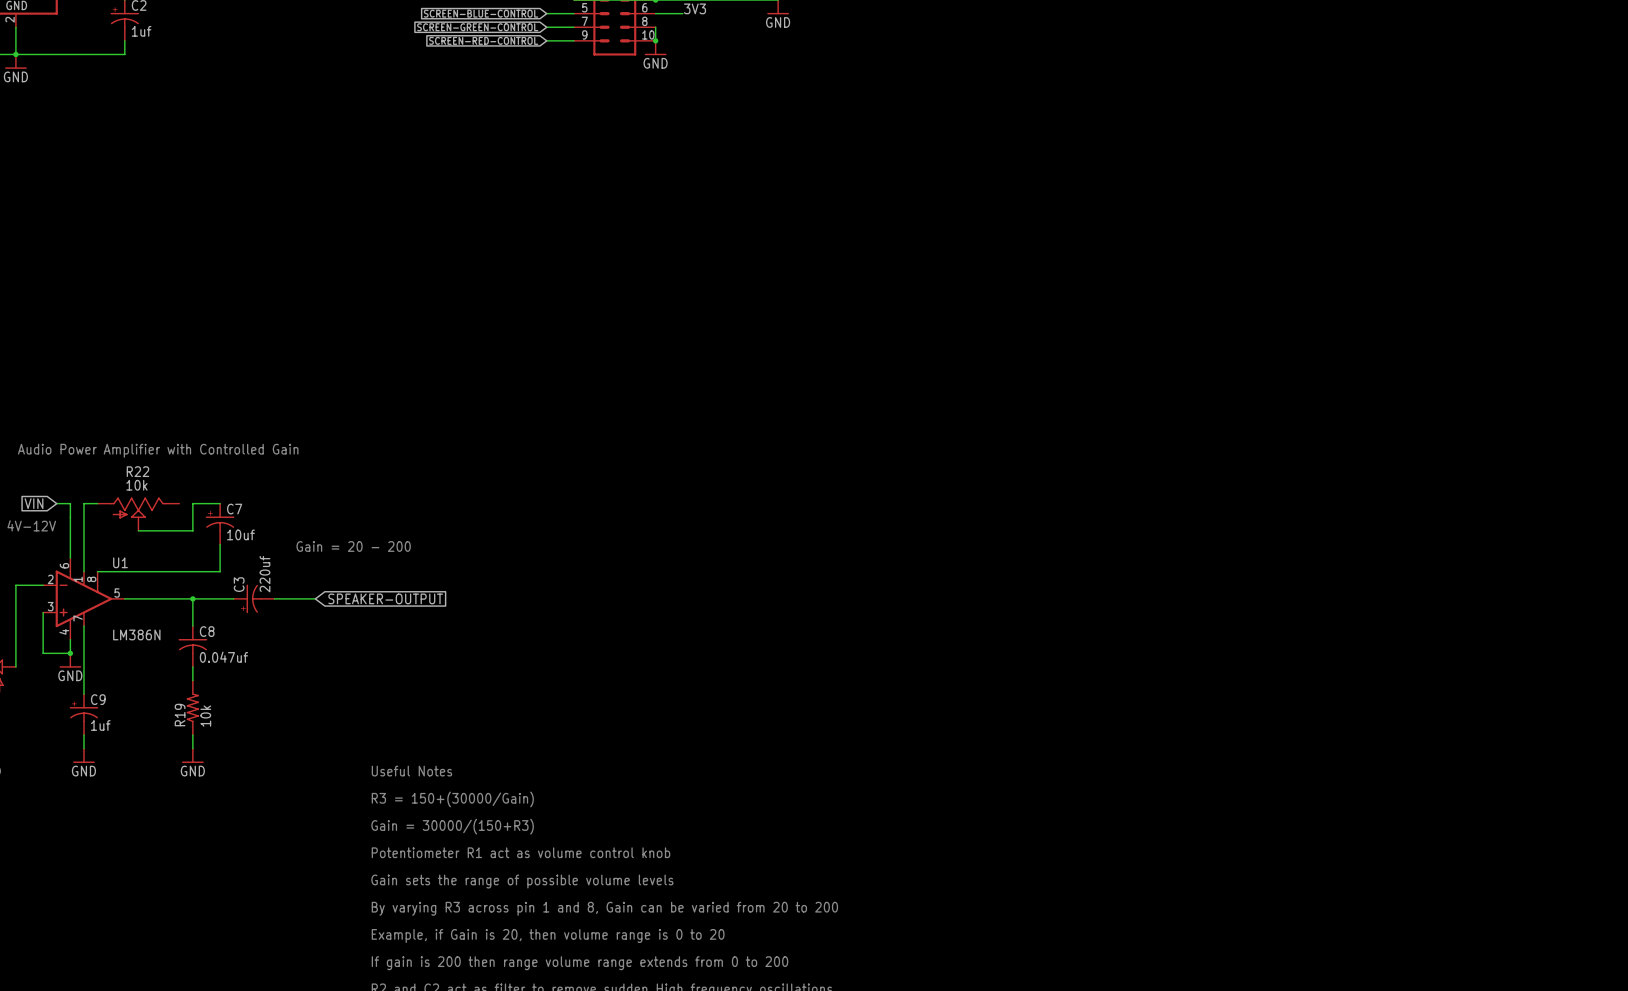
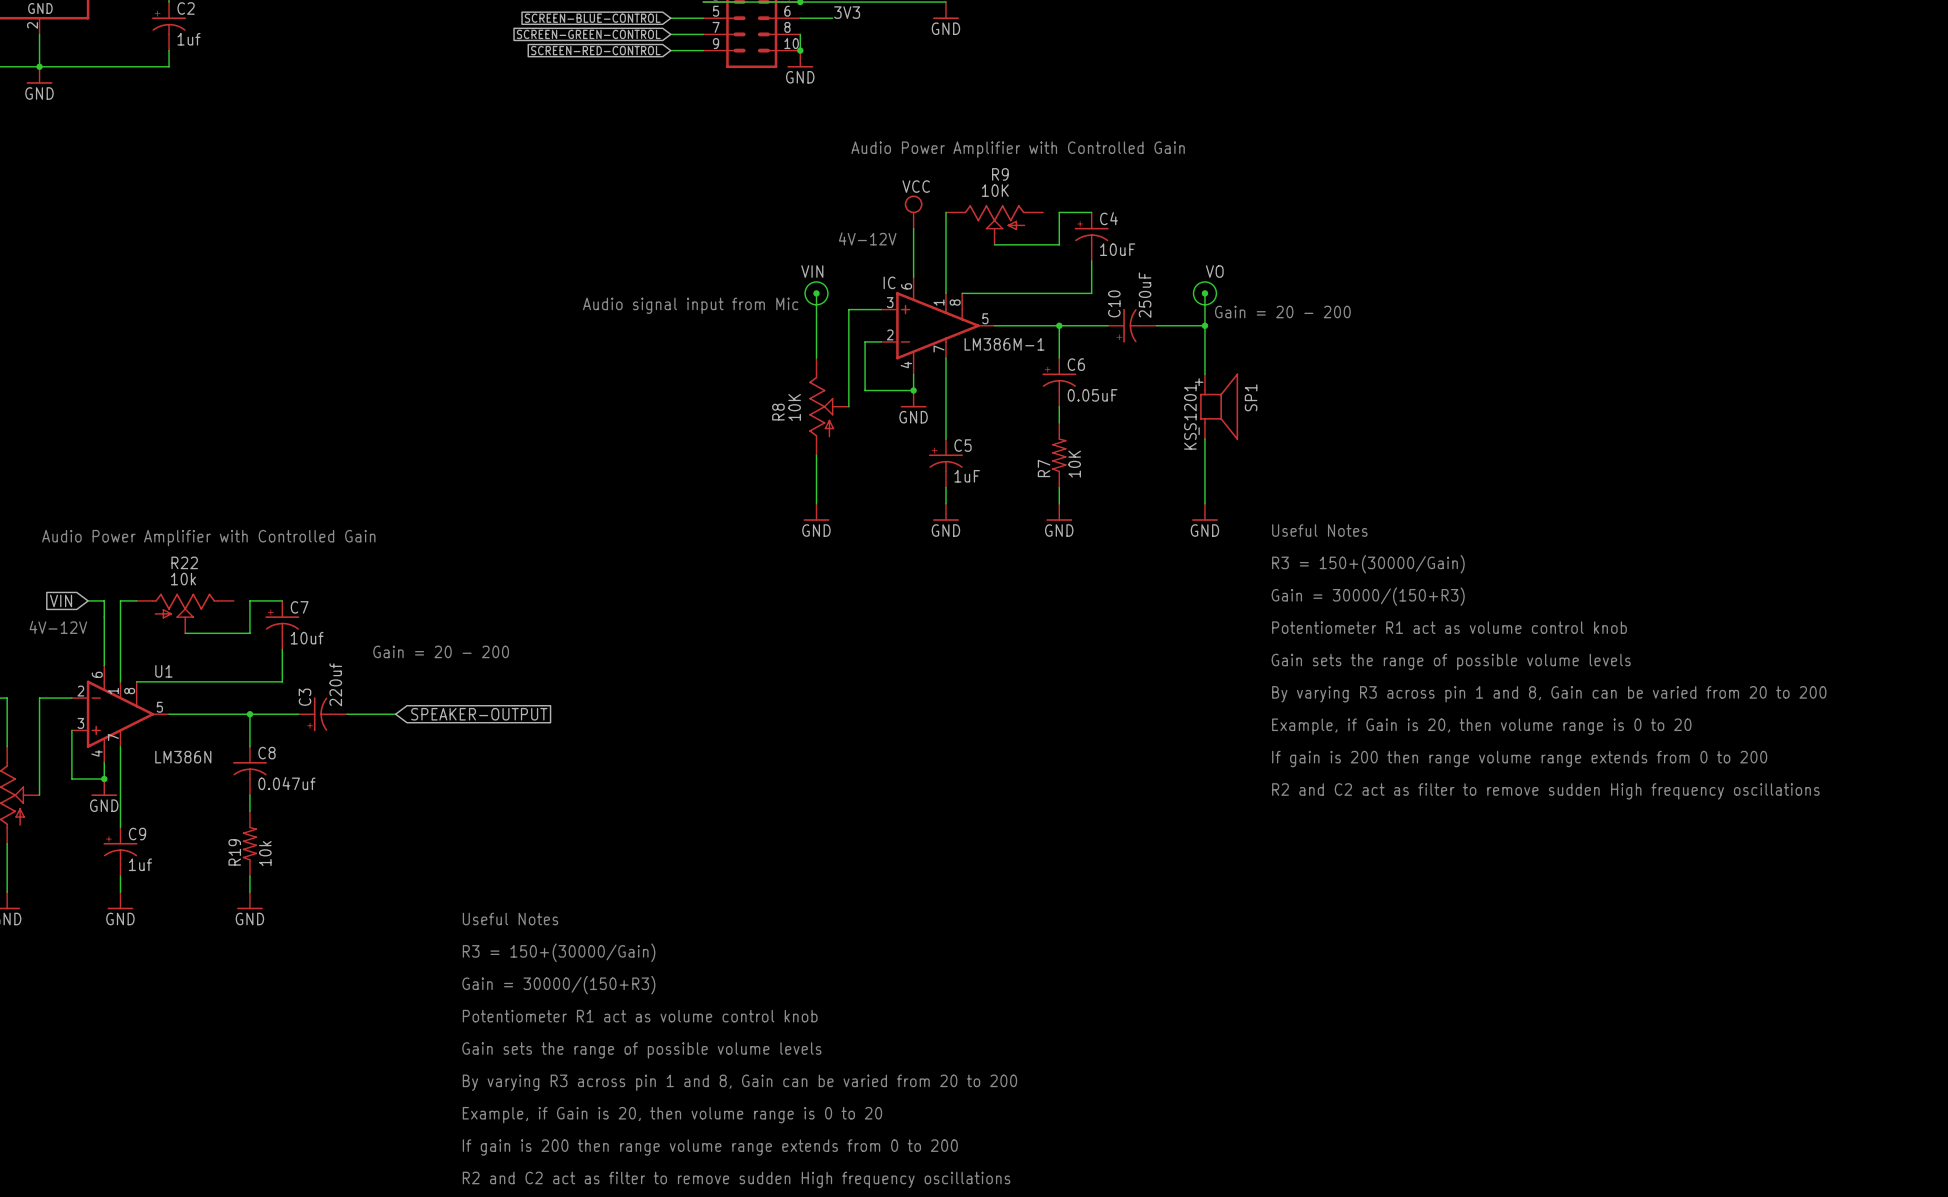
text: none -> Audio Power Amplifier with Controlled Gain (1018, 149)
power symbol: none -> VCC (913, 212)
wire: none -> (945, 212) (945, 293)
wire: none -> (1091, 212) (1059, 212) (1059, 244) (994, 244)
R9: none -> 10K (994, 225)
wire: none -> (913, 228) (913, 277)
C4: none -> 10uF (1091, 236)
text: none -> 4V-12V (867, 238)
wire: none -> (1091, 261) (1091, 293) (962, 293)
label: none -> VIN (812, 271)
label: none -> VO (1214, 271)
drawing: none -> [804, 281, 829, 306]
drawing: none -> [1193, 281, 1217, 306]
wire: none -> (816, 293) (816, 358)
junction: none -> (816, 293)
wire: none -> (1204, 293) (1204, 374)
junction: none -> (1204, 293)
text: none -> Audio signal input from Mic (690, 305)
wire: none -> (881, 309) (848, 309) (848, 406)
text: none -> Gain = 20 - 200 (1282, 312)
IC: none -> LM386M-1 (937, 325)
wire: none -> (994, 325) (1107, 325)
wire: none -> (1059, 325) (1059, 358)
junction: none -> (1059, 325)
C10: none -> 250uF (1132, 325)
wire: none -> (1156, 325) (1204, 325)
junction: none -> (1204, 325)
wire: none -> (881, 341) (865, 341) (865, 390) (913, 390) (913, 374)
wire: none -> (945, 358) (945, 439)
C6: none -> 0.05uF (1059, 382)
junction: none -> (913, 390)
power symbol: none -> GND (913, 399)
R8: none -> 10K (829, 406)
wire: none -> (1059, 406) (1059, 422)
SP1: none -> KSS1201 (1219, 406)
wire: none -> (1204, 439) (1204, 503)
wire: none -> (816, 455) (816, 503)
R7: none -> 10K (1059, 455)
C5: none -> 1uF (945, 463)
wire: none -> (945, 487) (945, 503)
wire: none -> (1059, 487) (1059, 503)
power symbol: none -> GND (816, 512)
power symbol: none -> GND (945, 512)
power symbol: none -> GND (1059, 512)
power symbol: none -> GND (1204, 512)
text: none -> Useful Notes (1319, 530)
text: none -> R3 = 150+(30000/Gain) (1368, 564)
text: none -> Gain = 30000/(150+R3) (1368, 596)
text: none -> Potentiometer R1 act as volume control knob (1449, 627)
text: none -> Gain sets the range of possible volume levels (1451, 661)
text: none -> By varying R3 across pin 1 and 8, Gain can be varied from 20 to 200 (1549, 694)
text: none -> Example, if Gain is 20, then volume range is 0 to 20 (1481, 726)
text: none -> If gain is 200 then range volume range extends from 0 to 200 (1519, 759)
text: none -> R2 and C2 act as filter to remove sudden High frequency oscillations (1545, 791)

